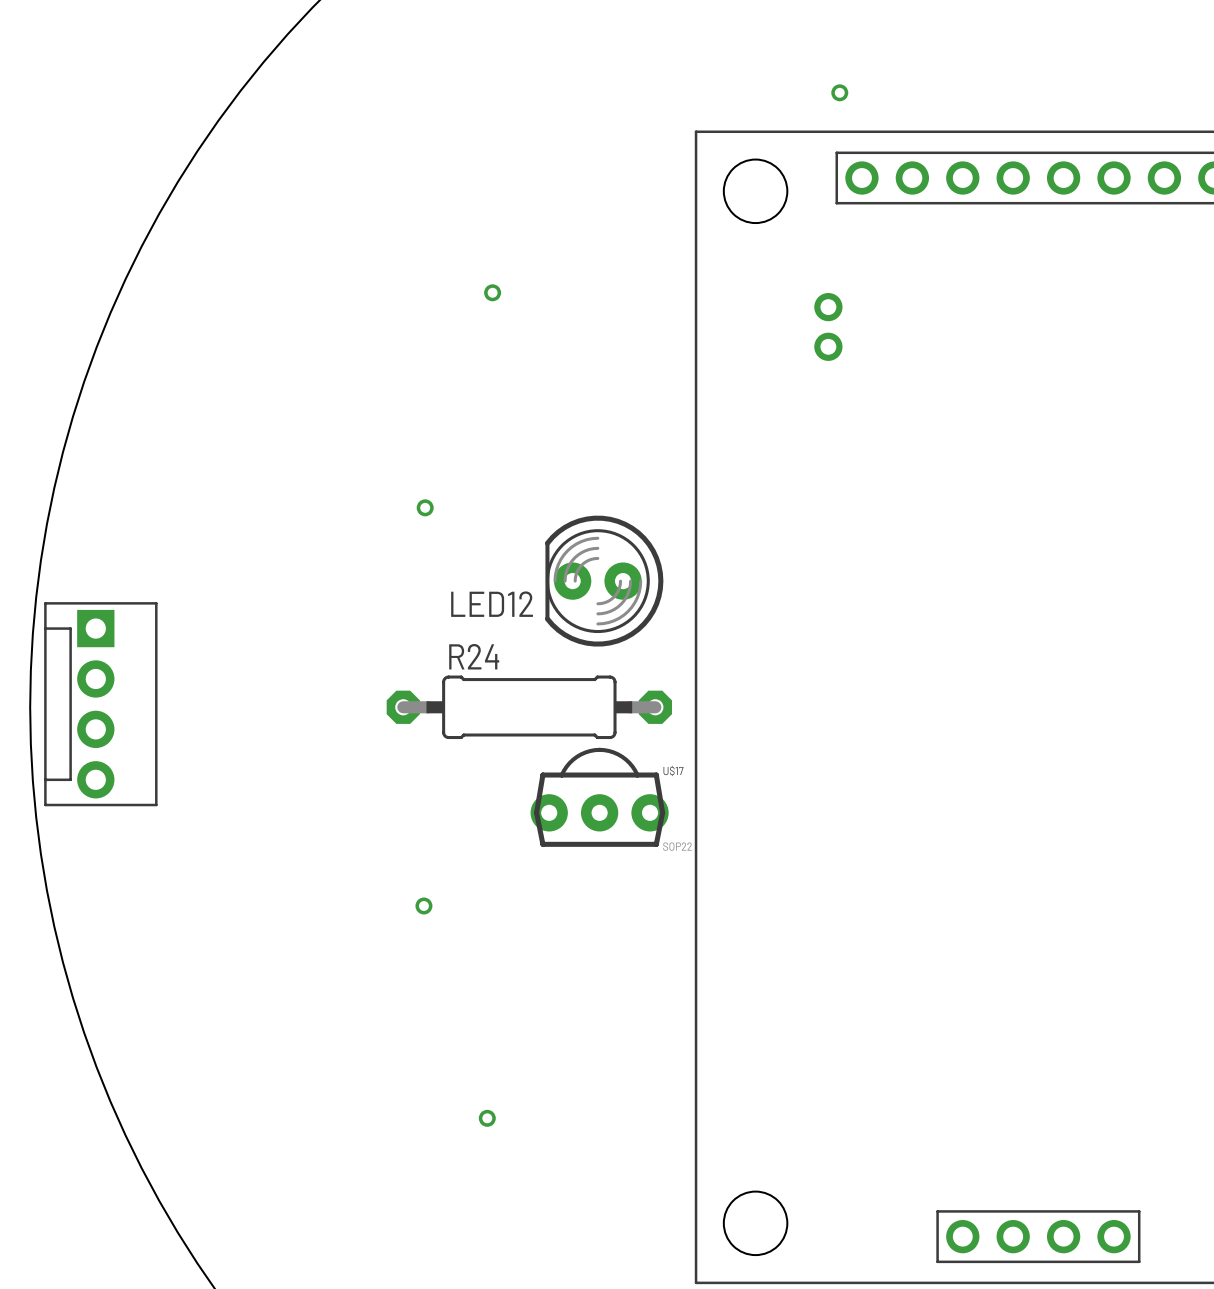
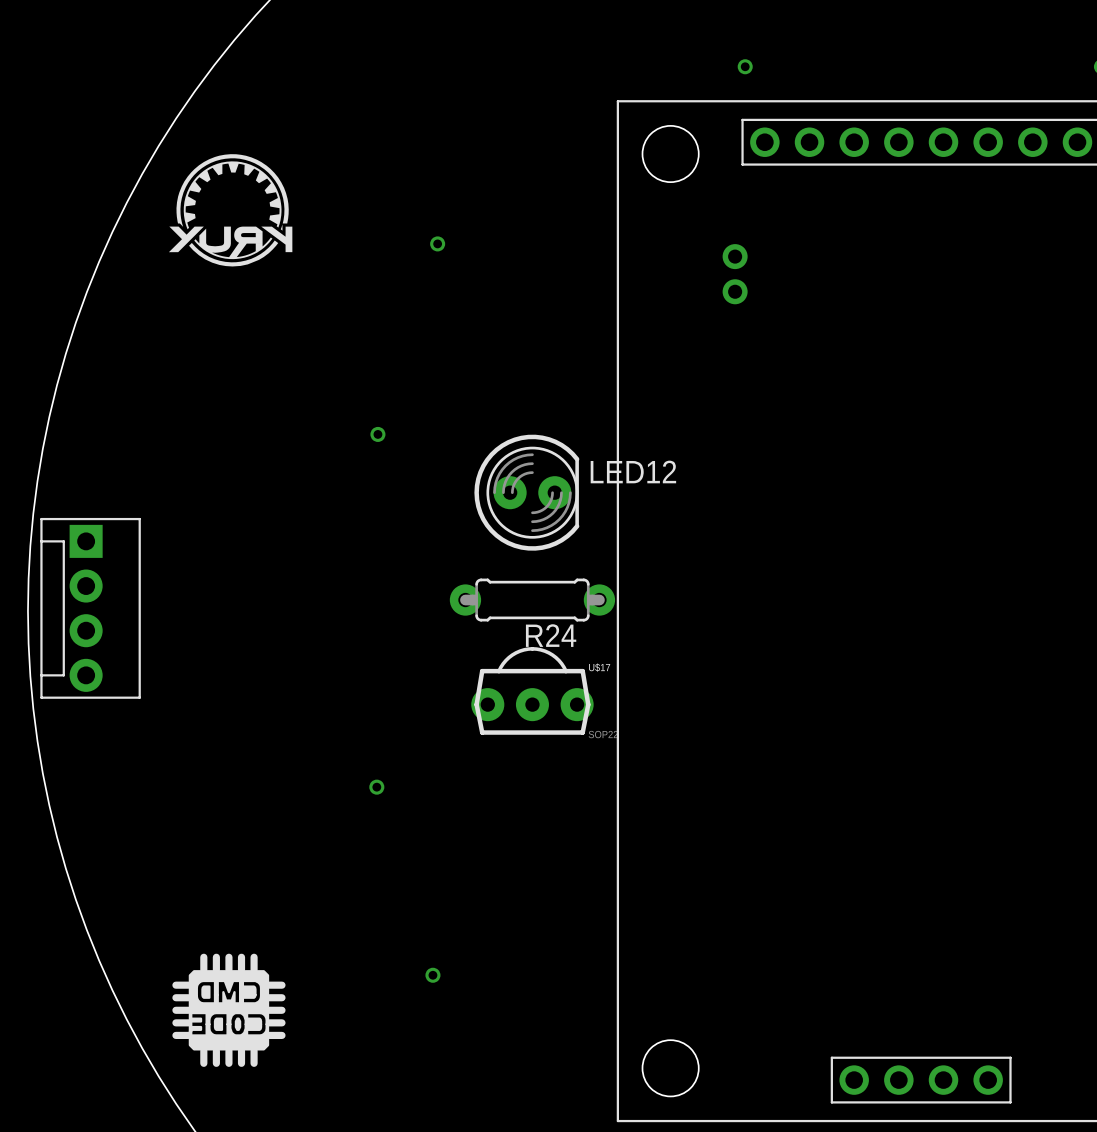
drawing: none -> [168, 154, 293, 267]
LED12 rotation: 0° (604, 581) -> 180° (526, 492)
R24 name position: R24 (474, 656) -> R24 (551, 635)
R24 footprint: [386, 675, 672, 740] -> [449, 578, 616, 622]
drawing: none -> [172, 953, 286, 1067]

